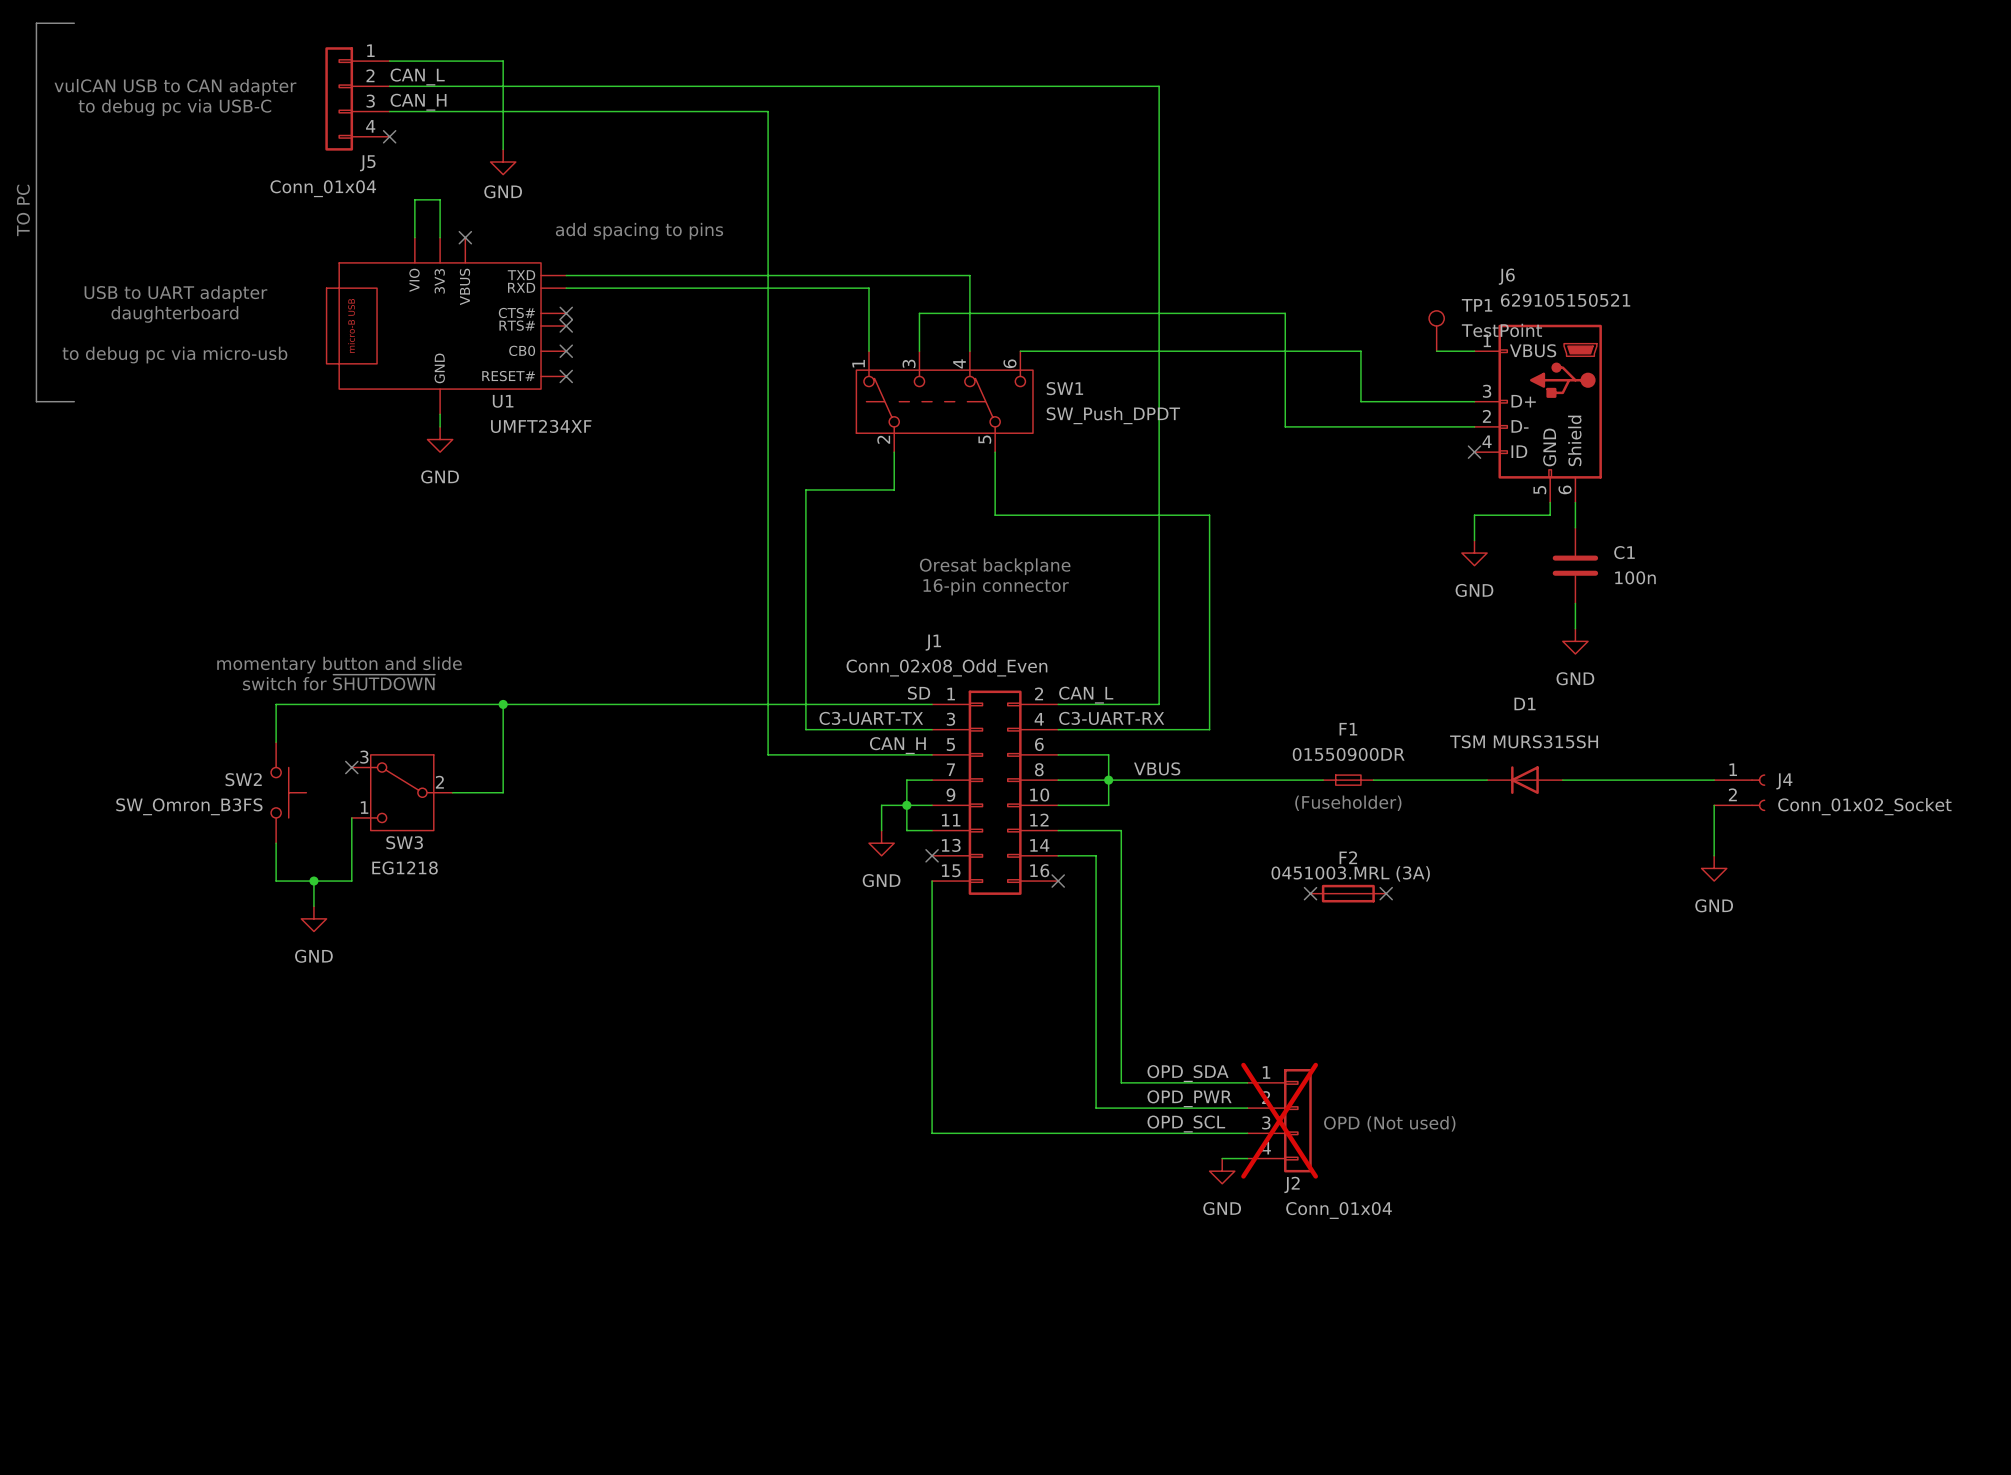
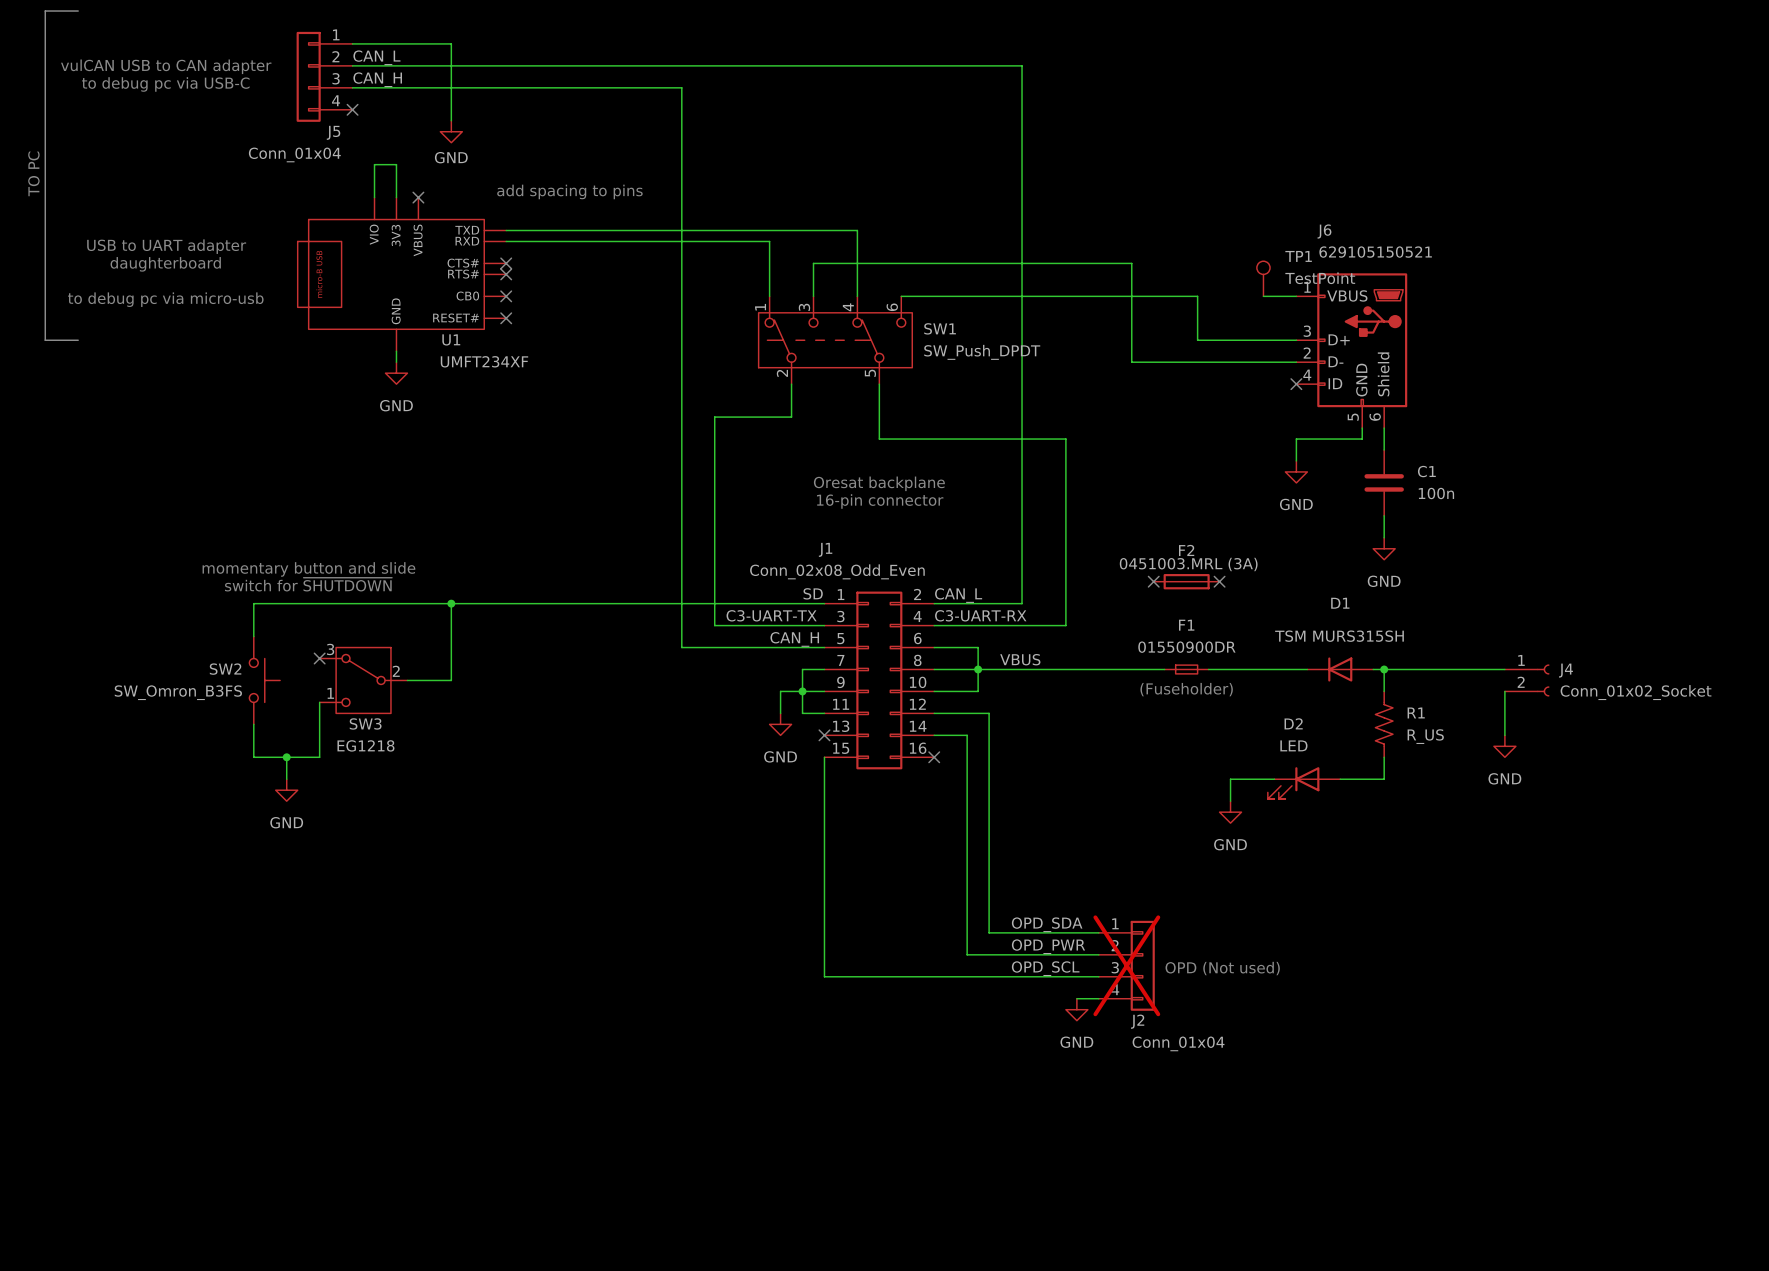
no-connect mark: none -> (1153, 581)
no-connect mark: none -> (1219, 581)
wire: none -> (1384, 669) (1384, 691)
junction: none -> (1384, 669)
R1: none -> R_US (1384, 724)
wire: none -> (1384, 757) (1384, 779) (1340, 779)
no-connect mark: (1310, 893) -> none
F2 position: (1348, 893) -> (1186, 581)
no-connect mark: (1386, 893) -> none
wire: none -> (1274, 779) (1230, 779) (1230, 801)
D2: none -> LED (1304, 783)
power symbol: none -> GND (1230, 812)

